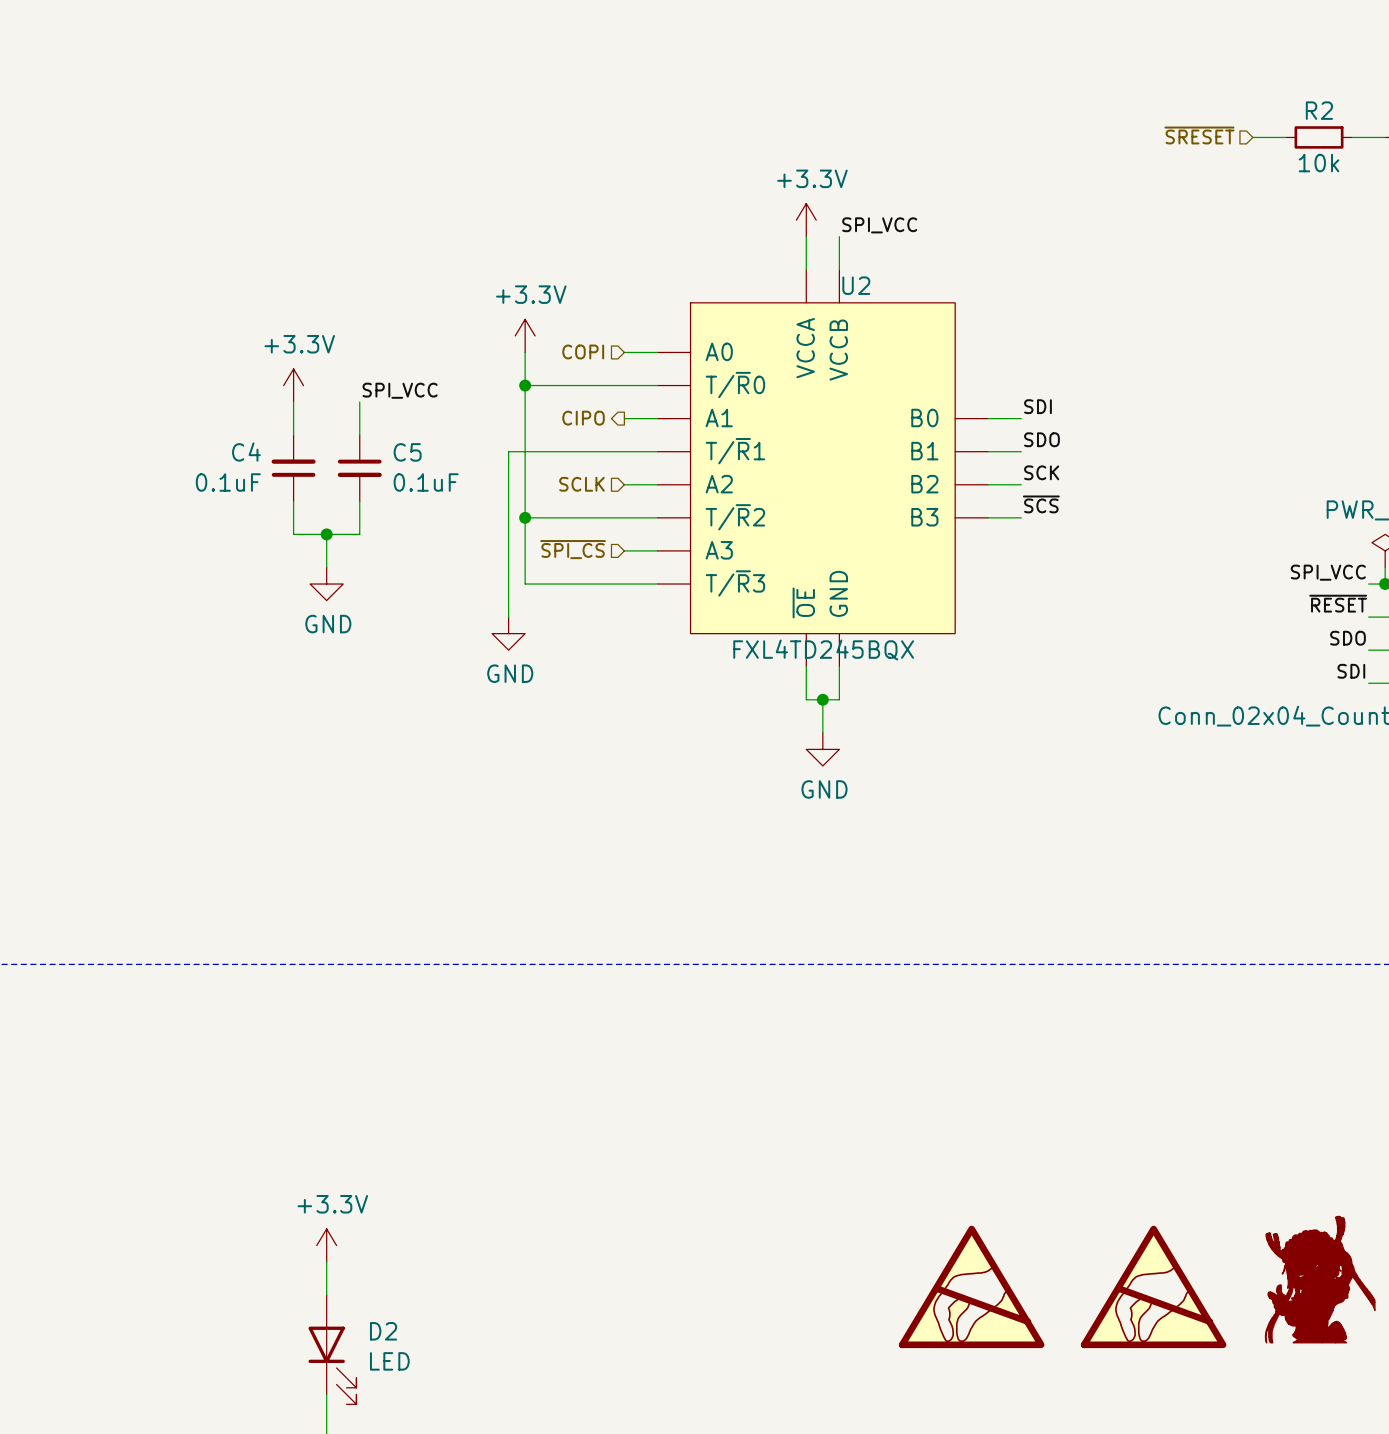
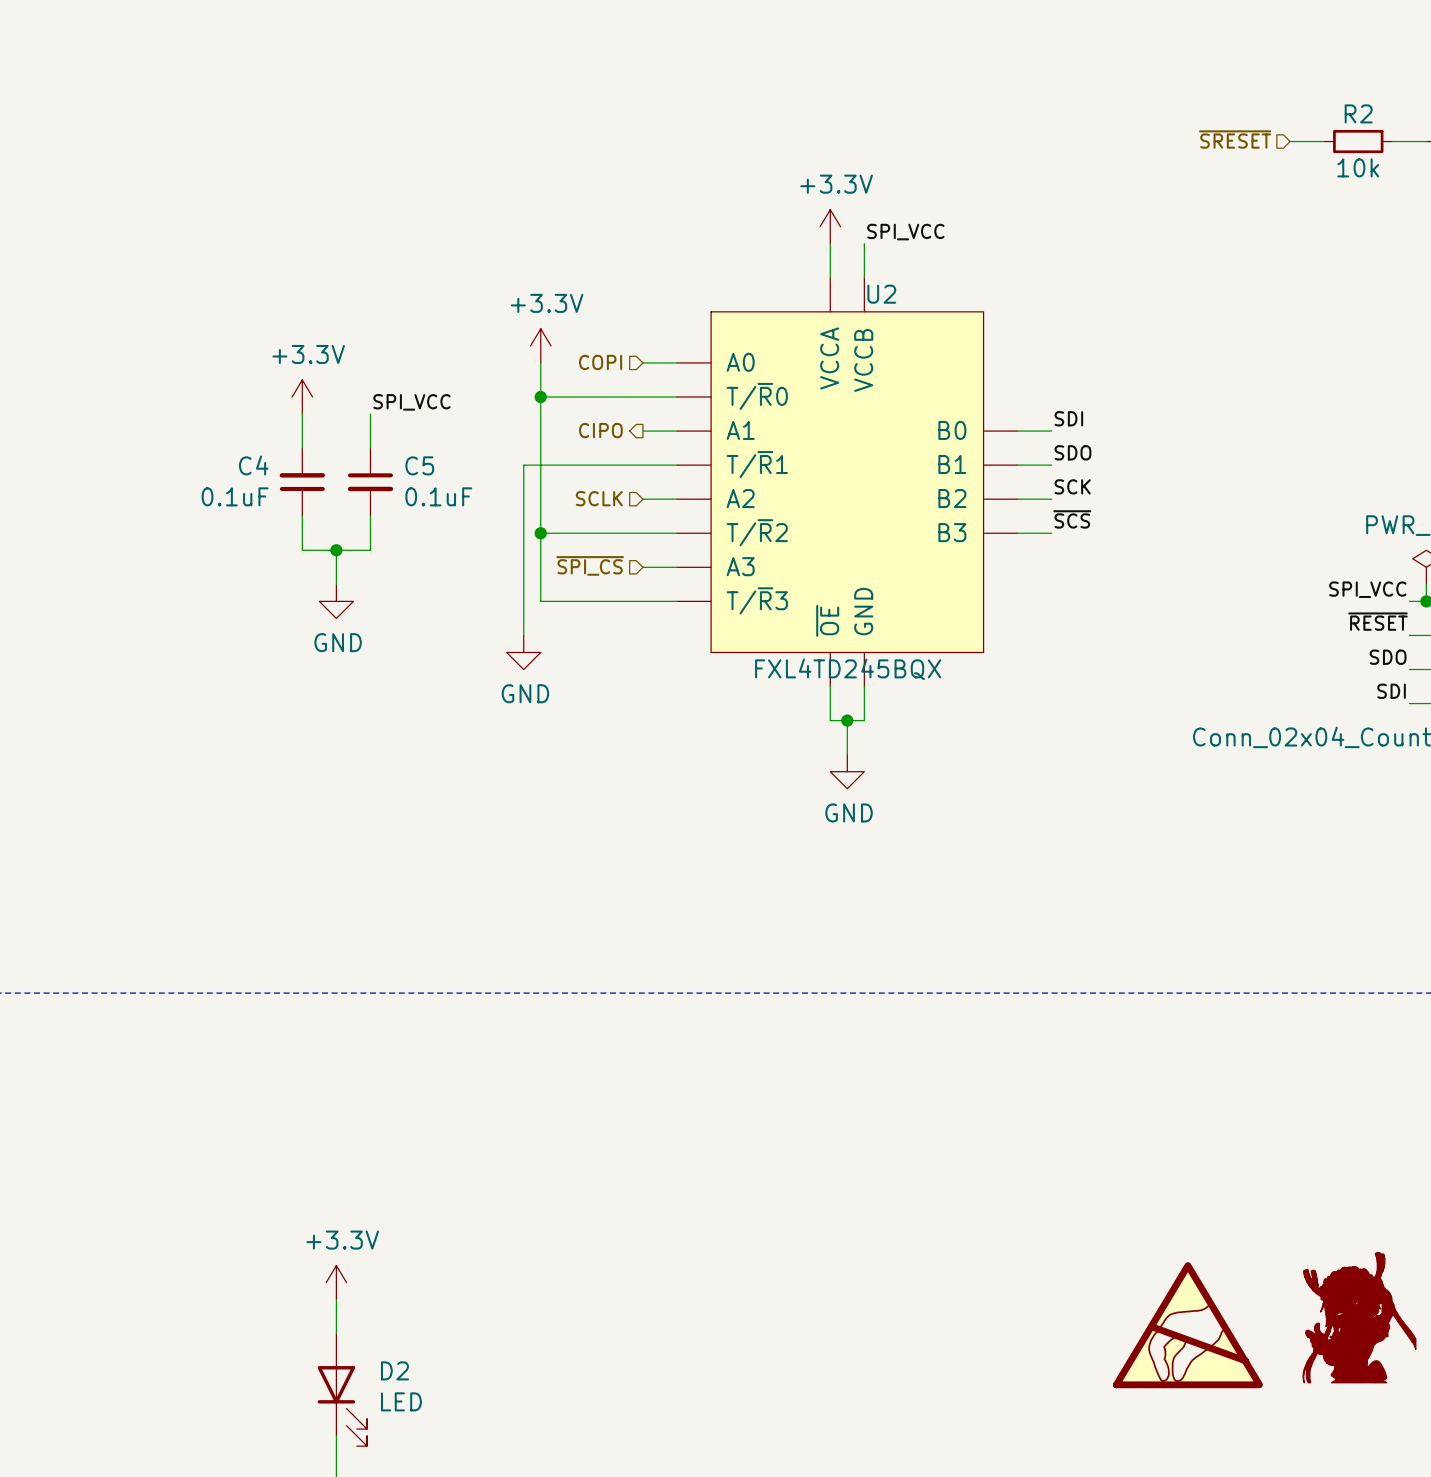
part: (971, 1286) -> none

